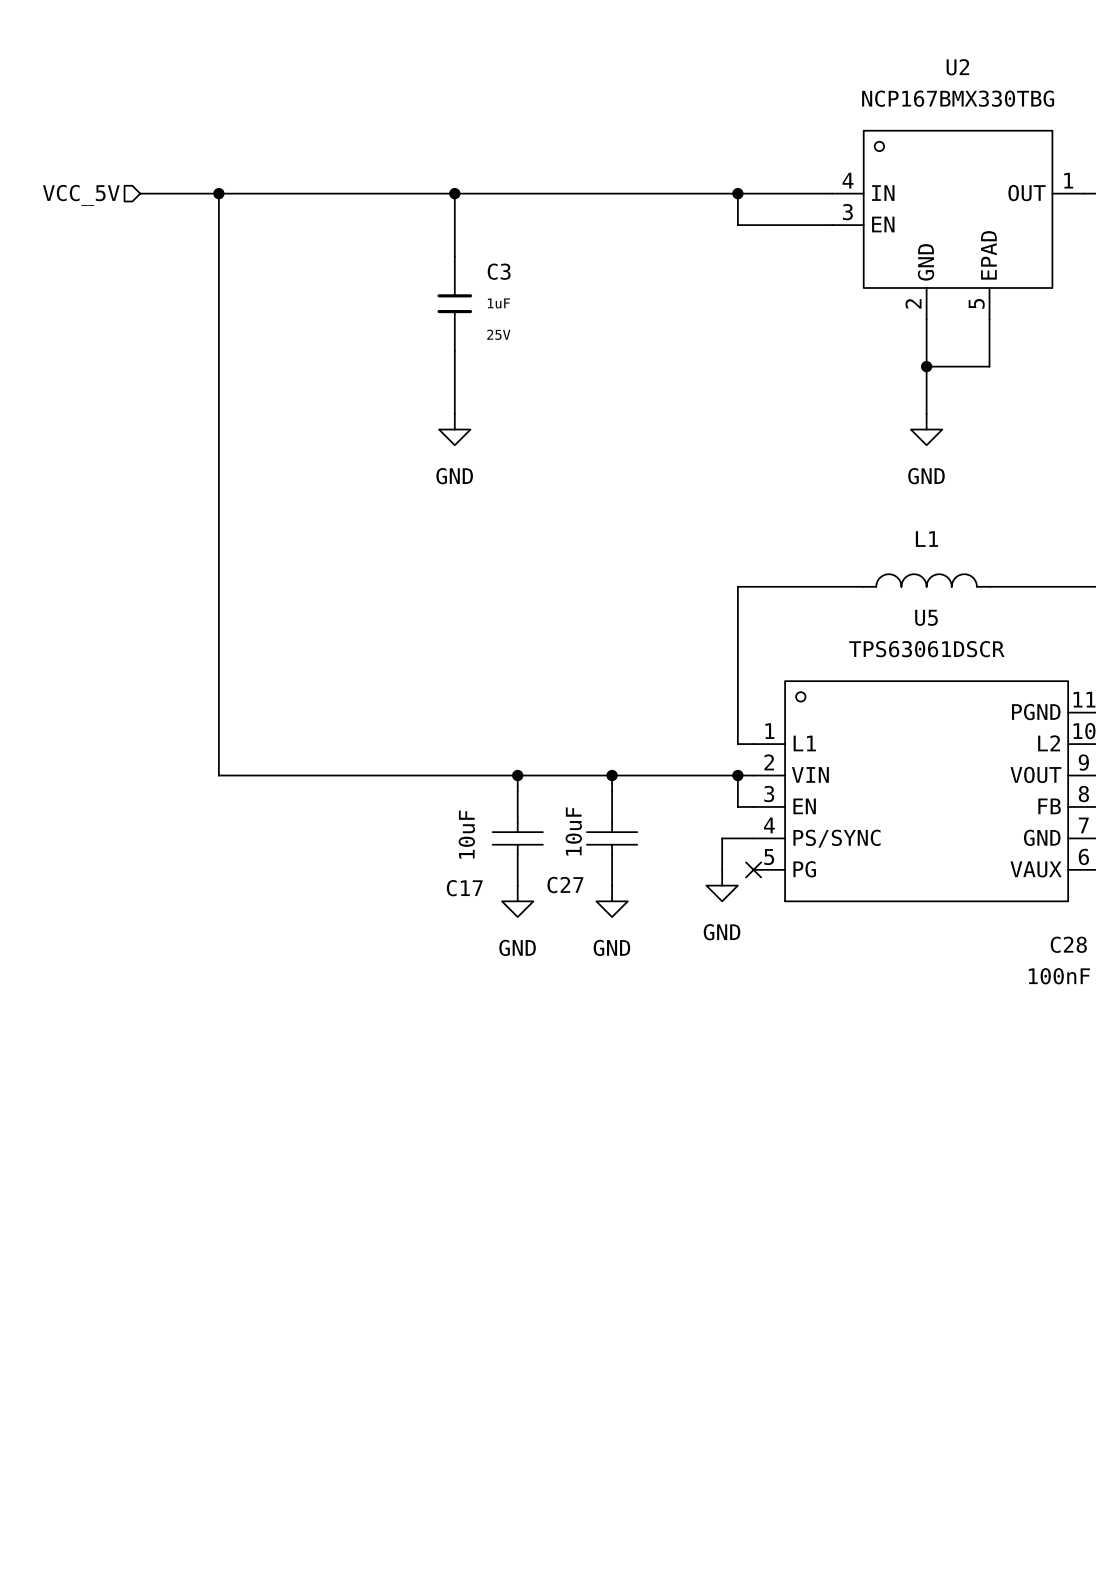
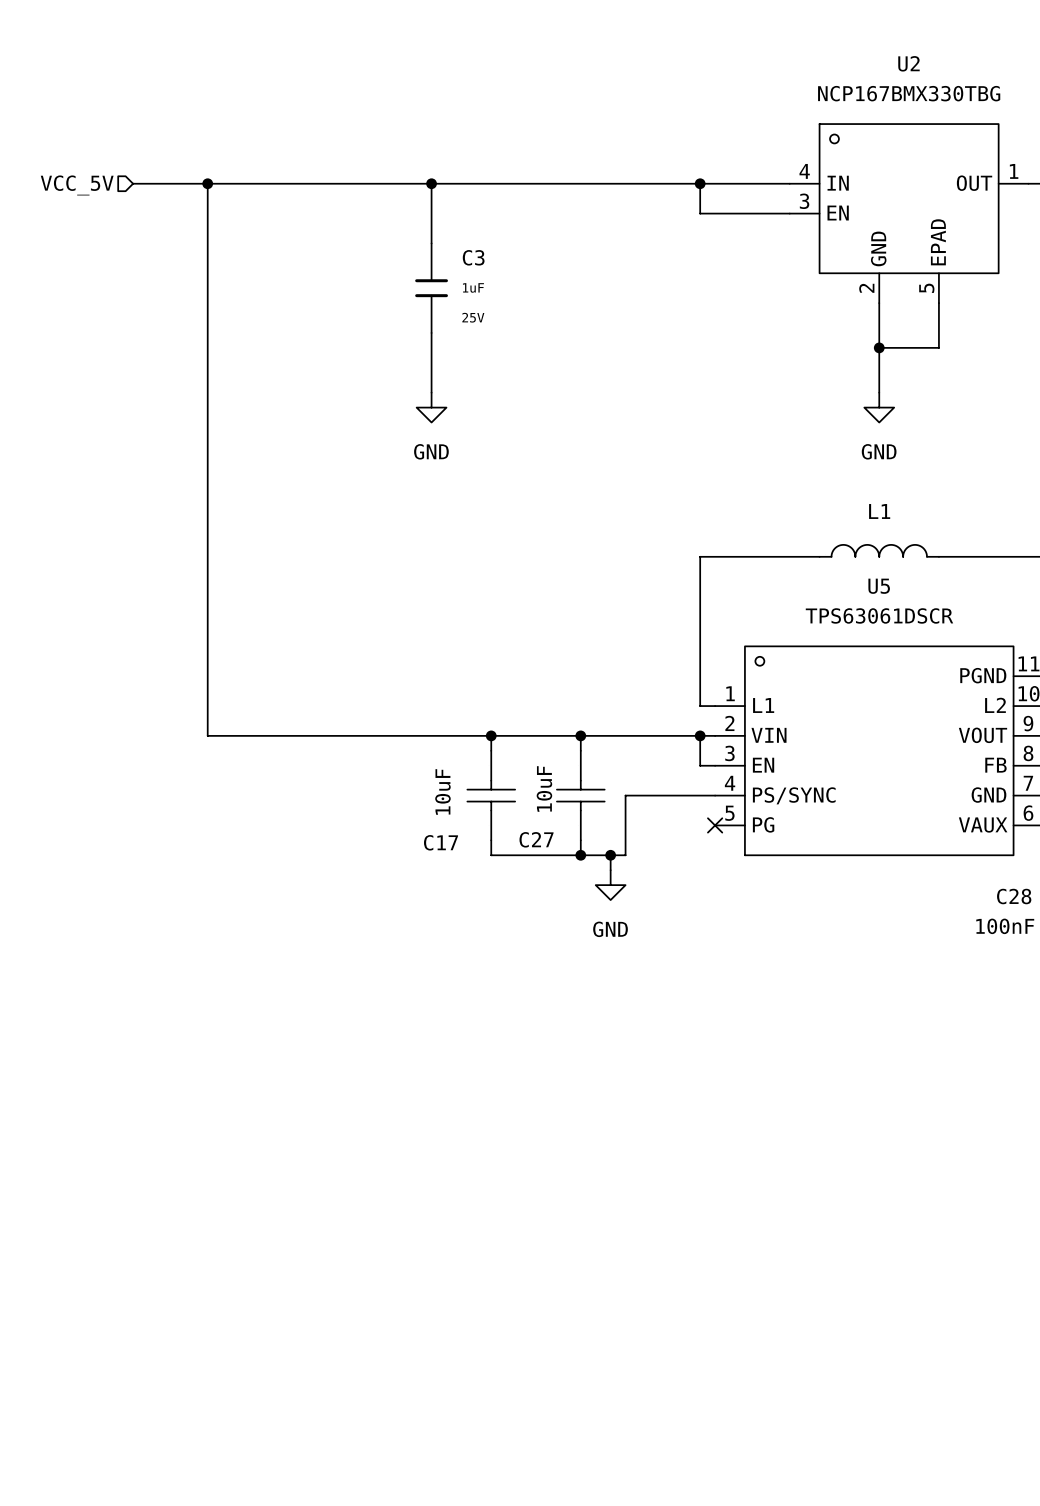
wire: (722, 838) (722, 869) -> (685, 795) (625, 795) (625, 855) (491, 855) (491, 840)
power symbol: GND (722, 885) -> none
power symbol: GND (517, 901) -> none
power symbol position: GND (612, 901) -> GND (610, 885)
junction: none -> (580, 855)
wire: none -> (610, 855) (610, 870)
junction: none -> (610, 855)

